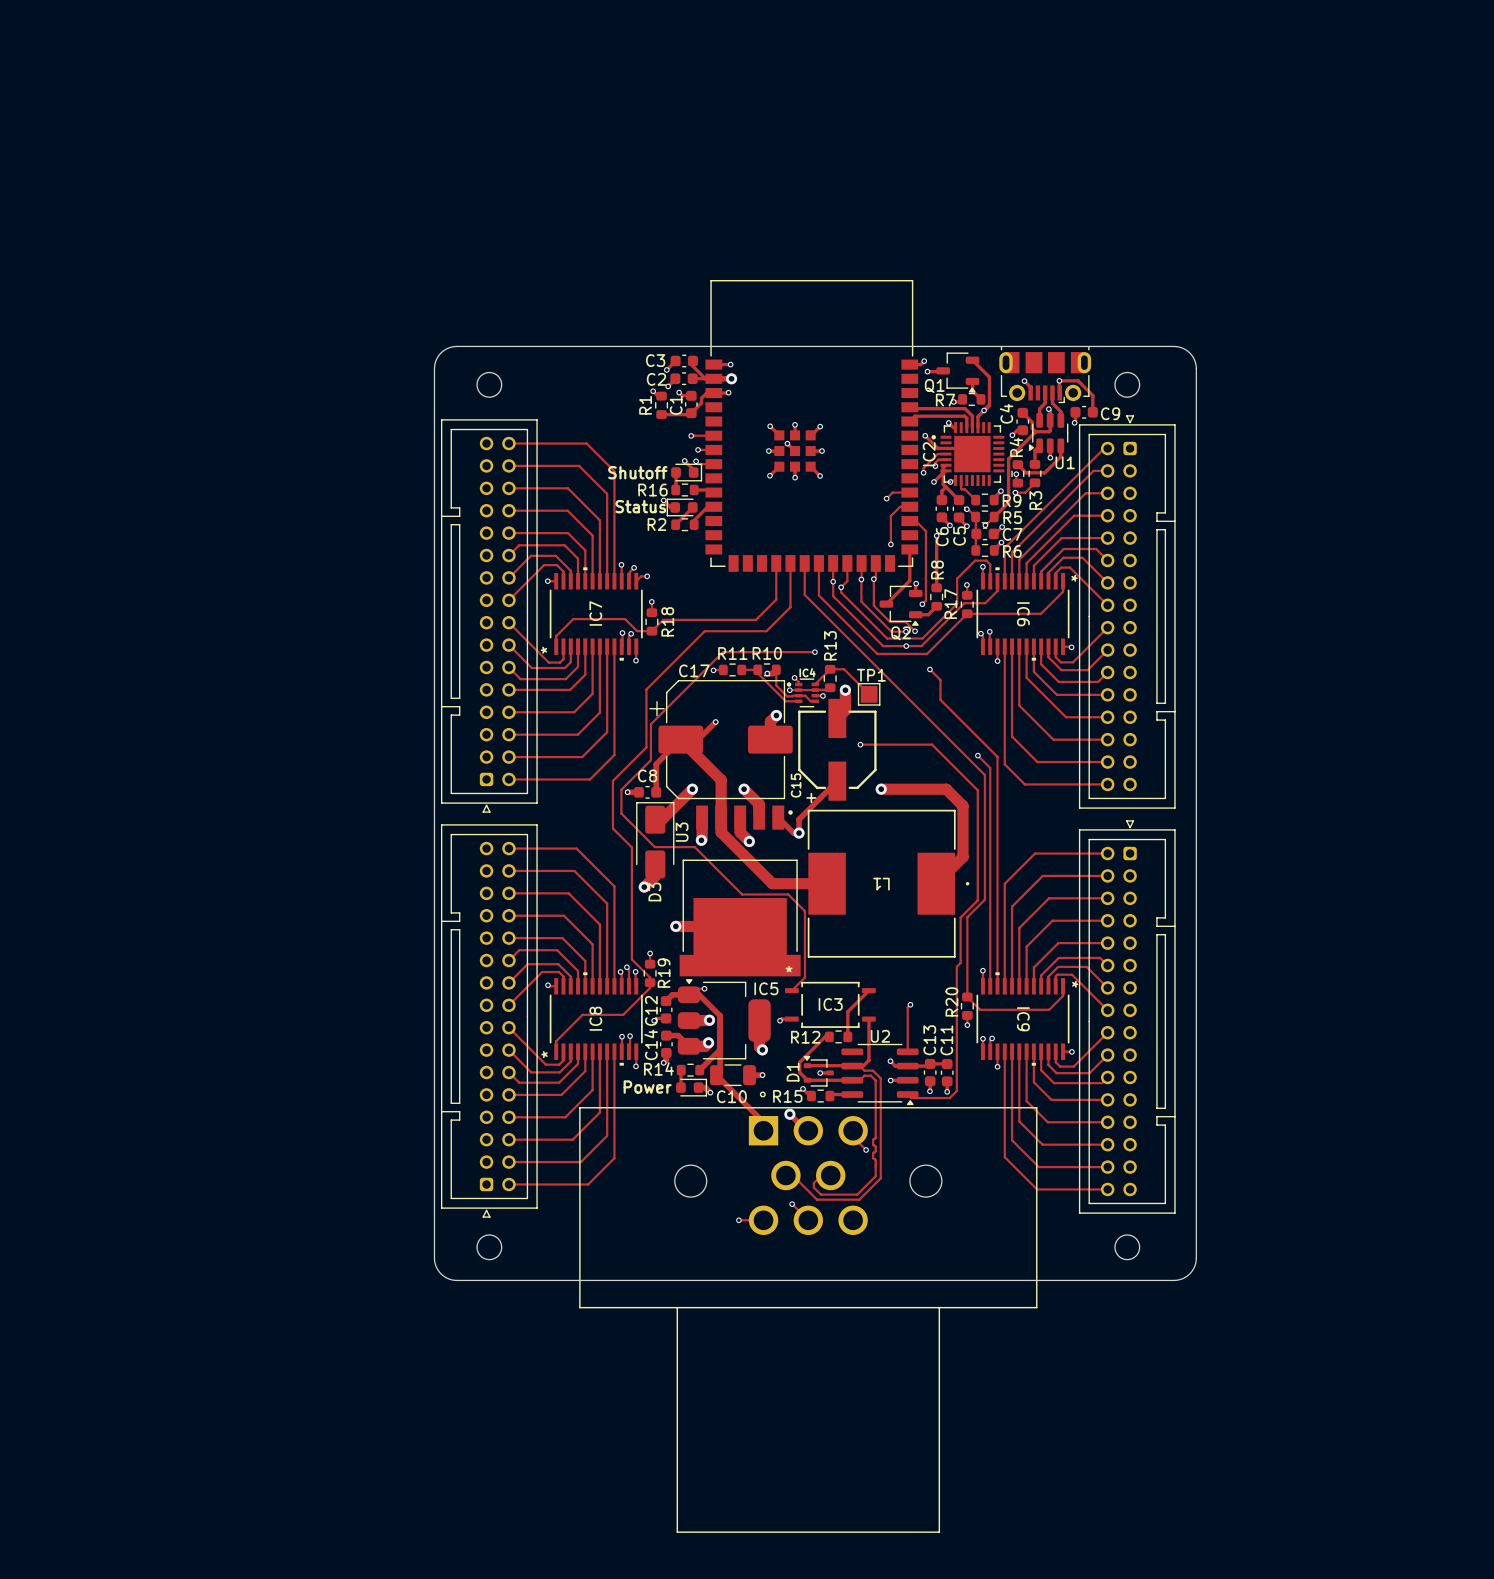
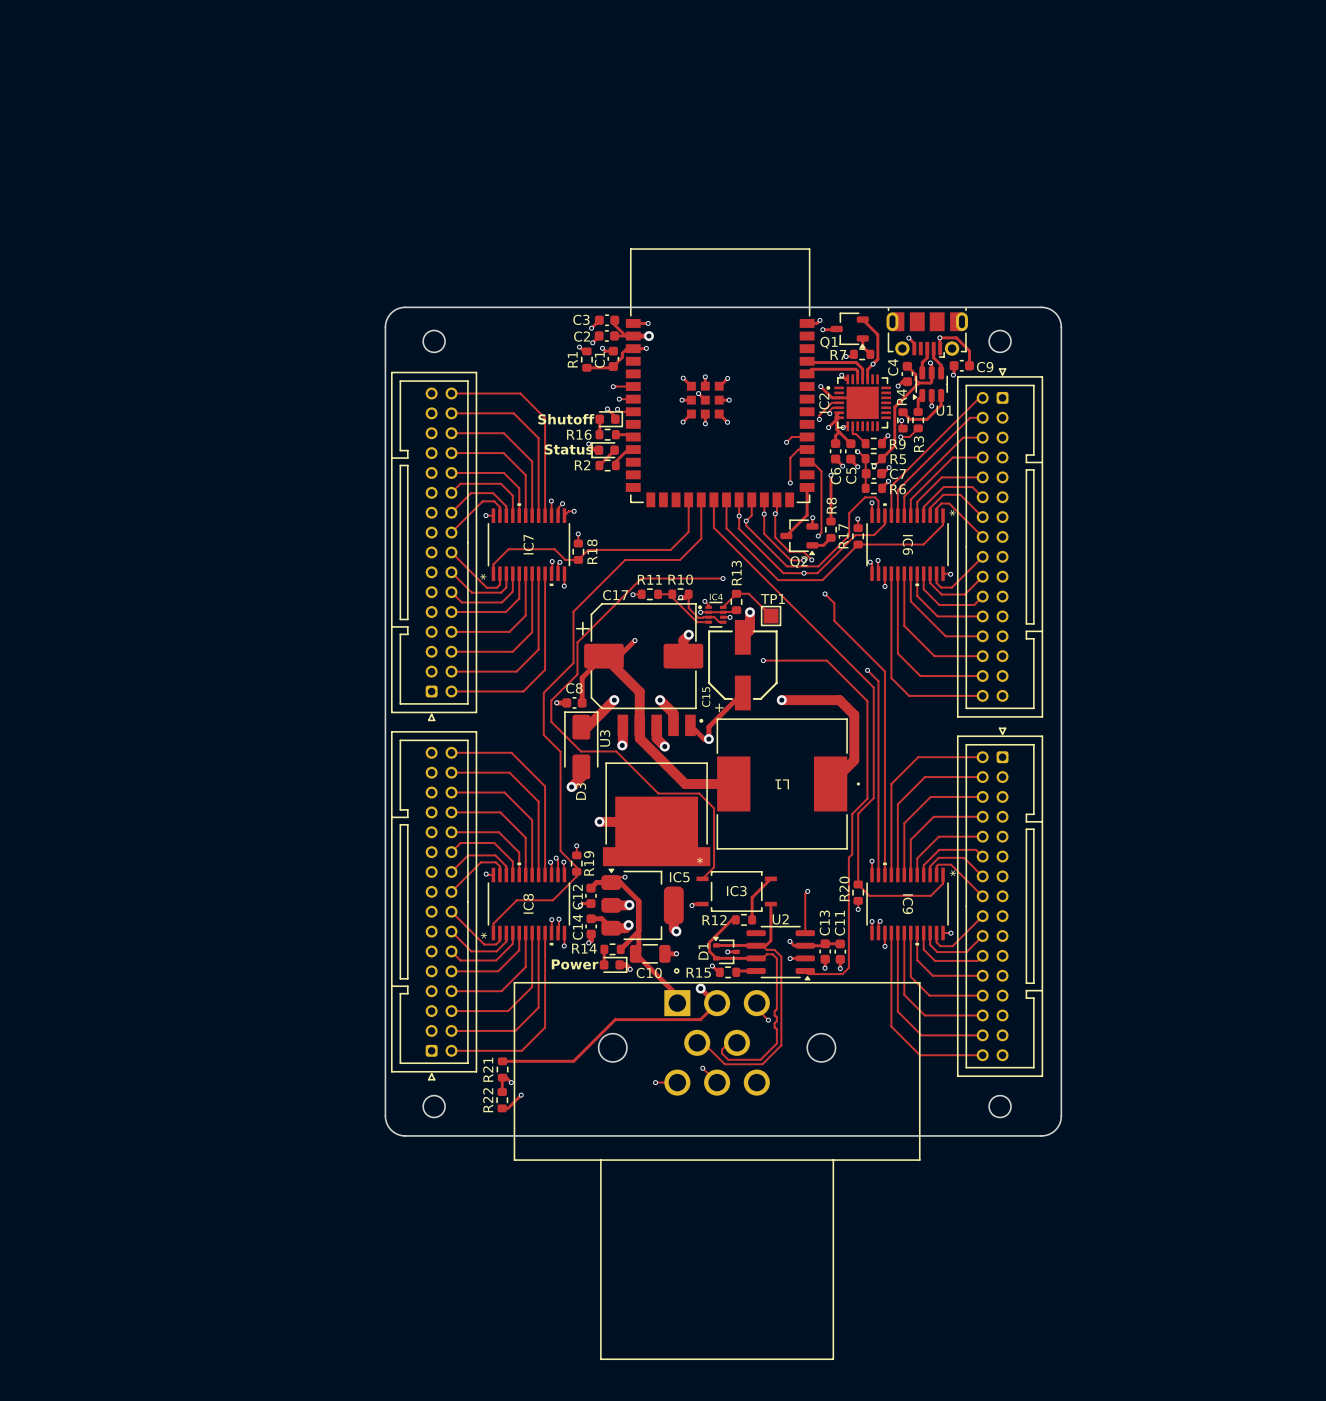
track: none -> (717, 1003) (700, 1019) (615, 1019) (573, 1061) (502, 1061)
R21: none -> (502, 1069)
track: none -> (511, 1082) (506, 1077) (502, 1077) (502, 1091)
via: none -> (511, 1082)
track: none -> (521, 1095) (507, 1108) (502, 1108)
via: none -> (521, 1095)
R22: none -> (502, 1100)

